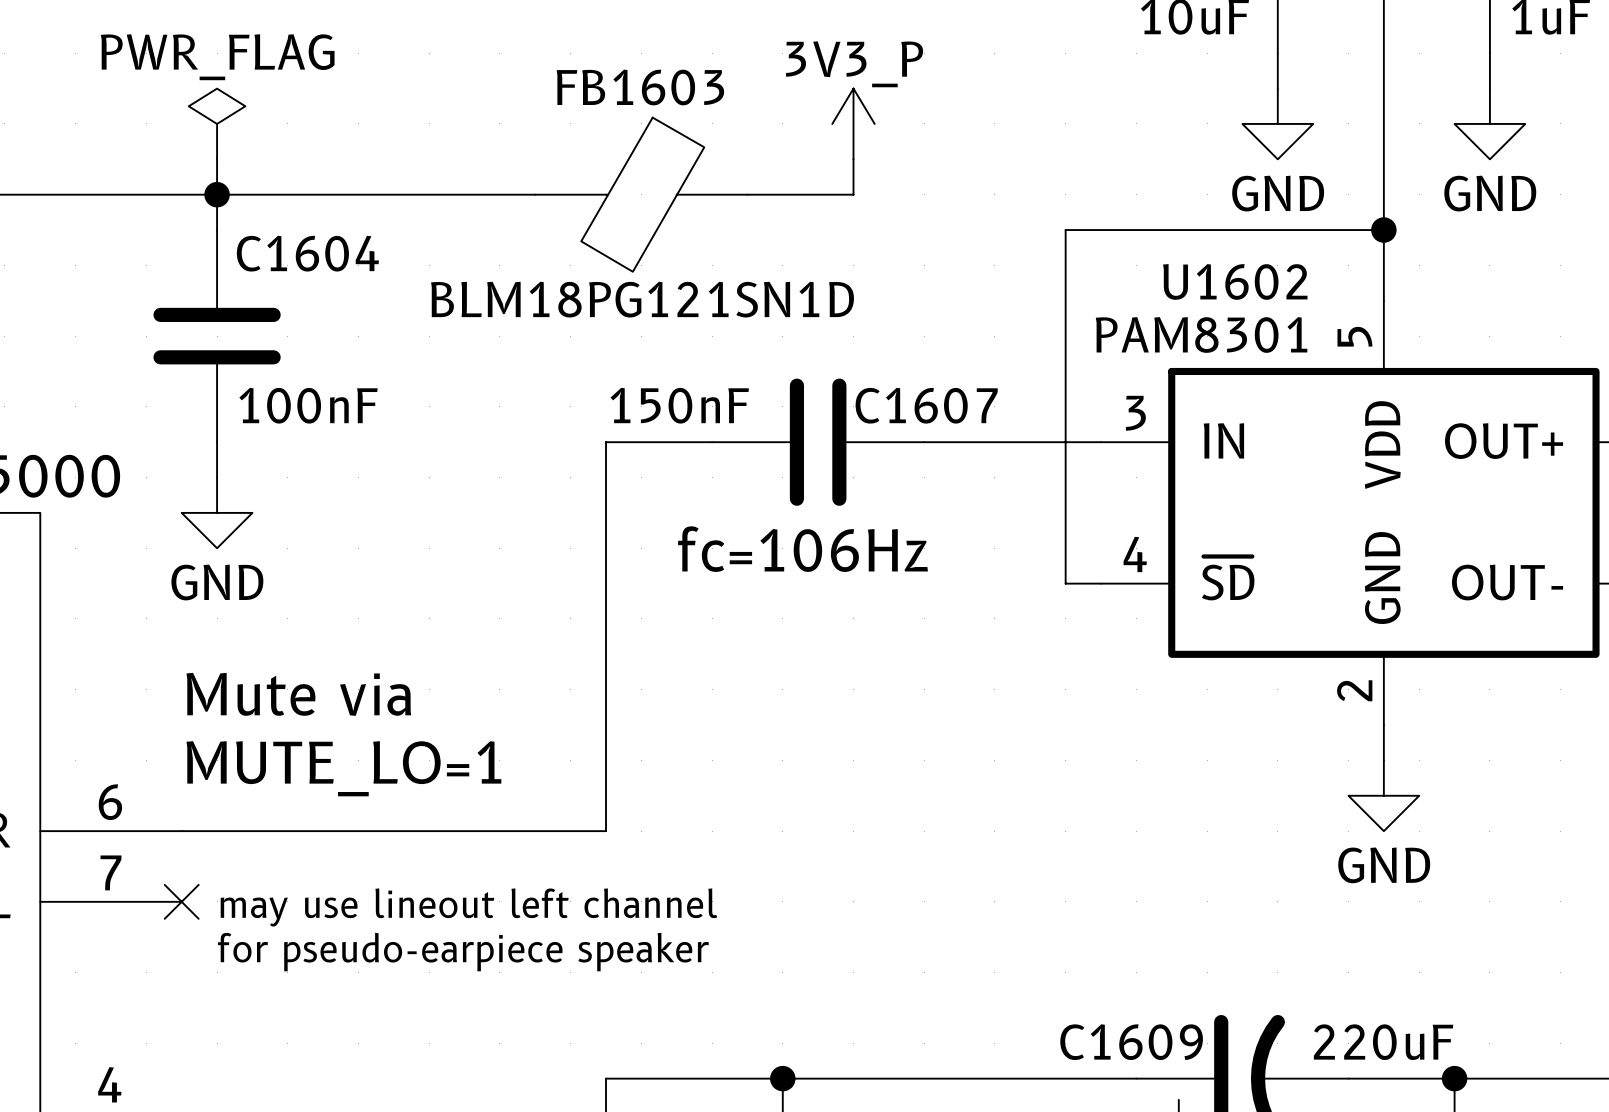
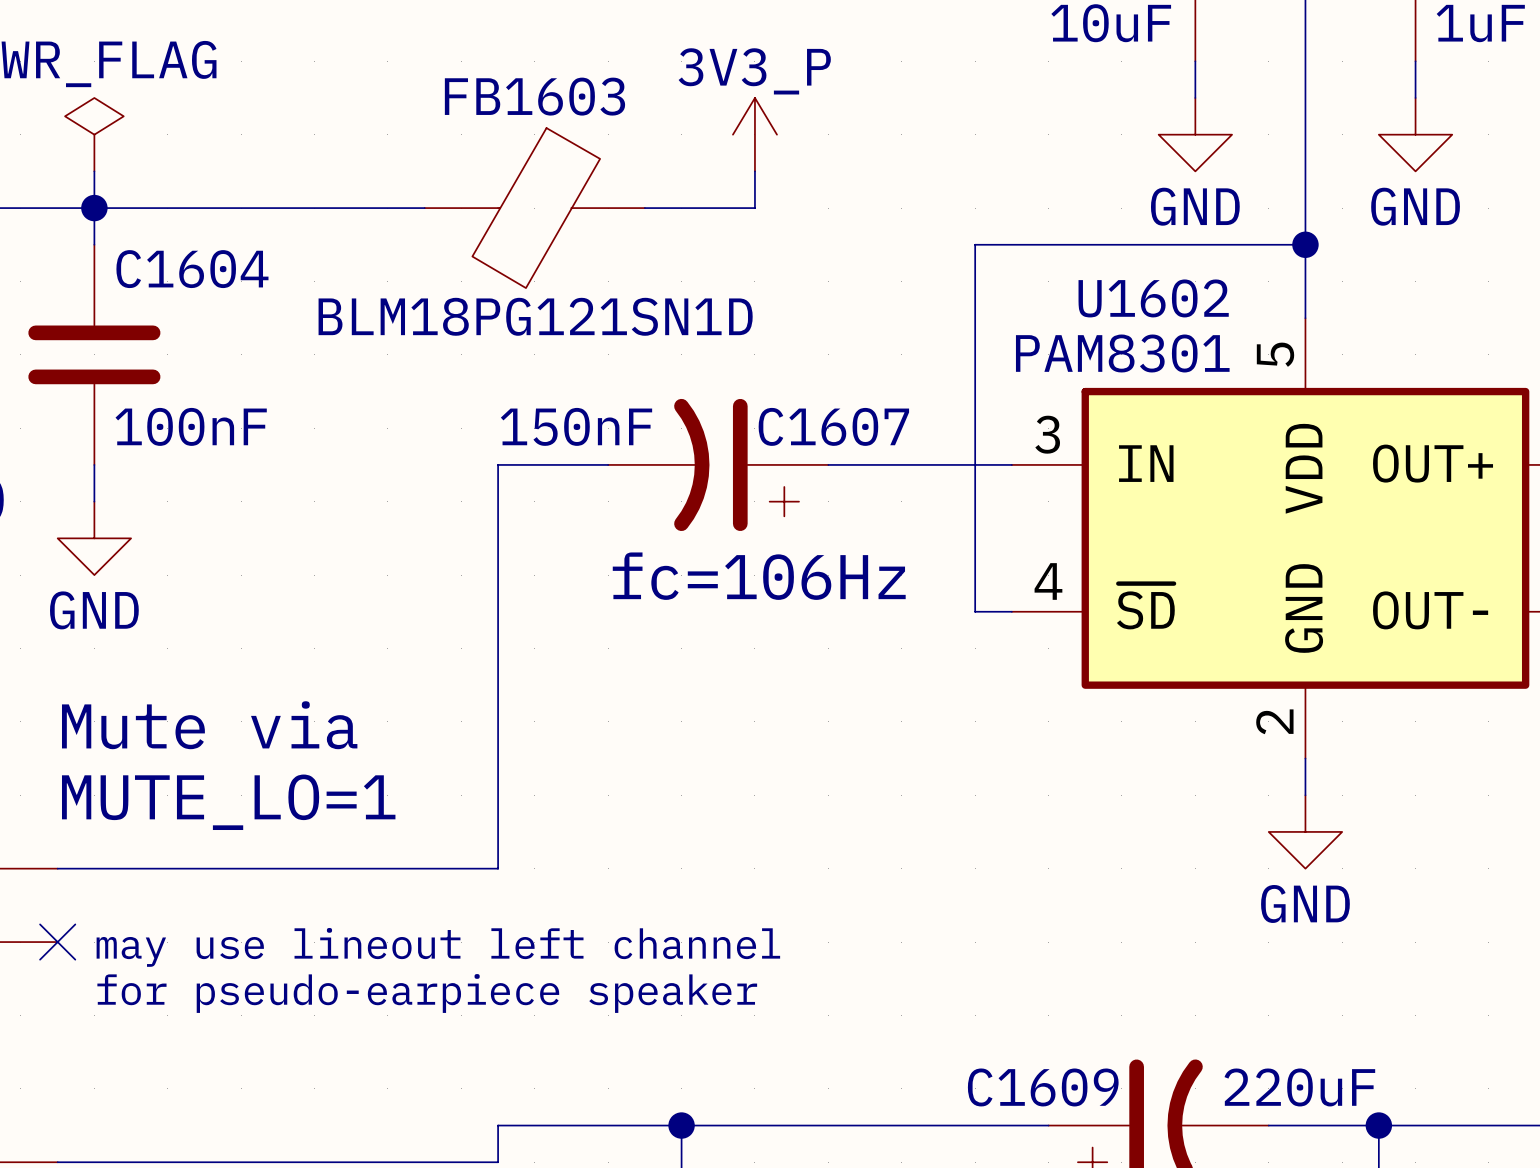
C1607 symbol: [712, 378, 925, 506] -> [608, 398, 829, 532]
text position: fc=106Hz (803, 549) -> fc=106Hz (759, 576)

